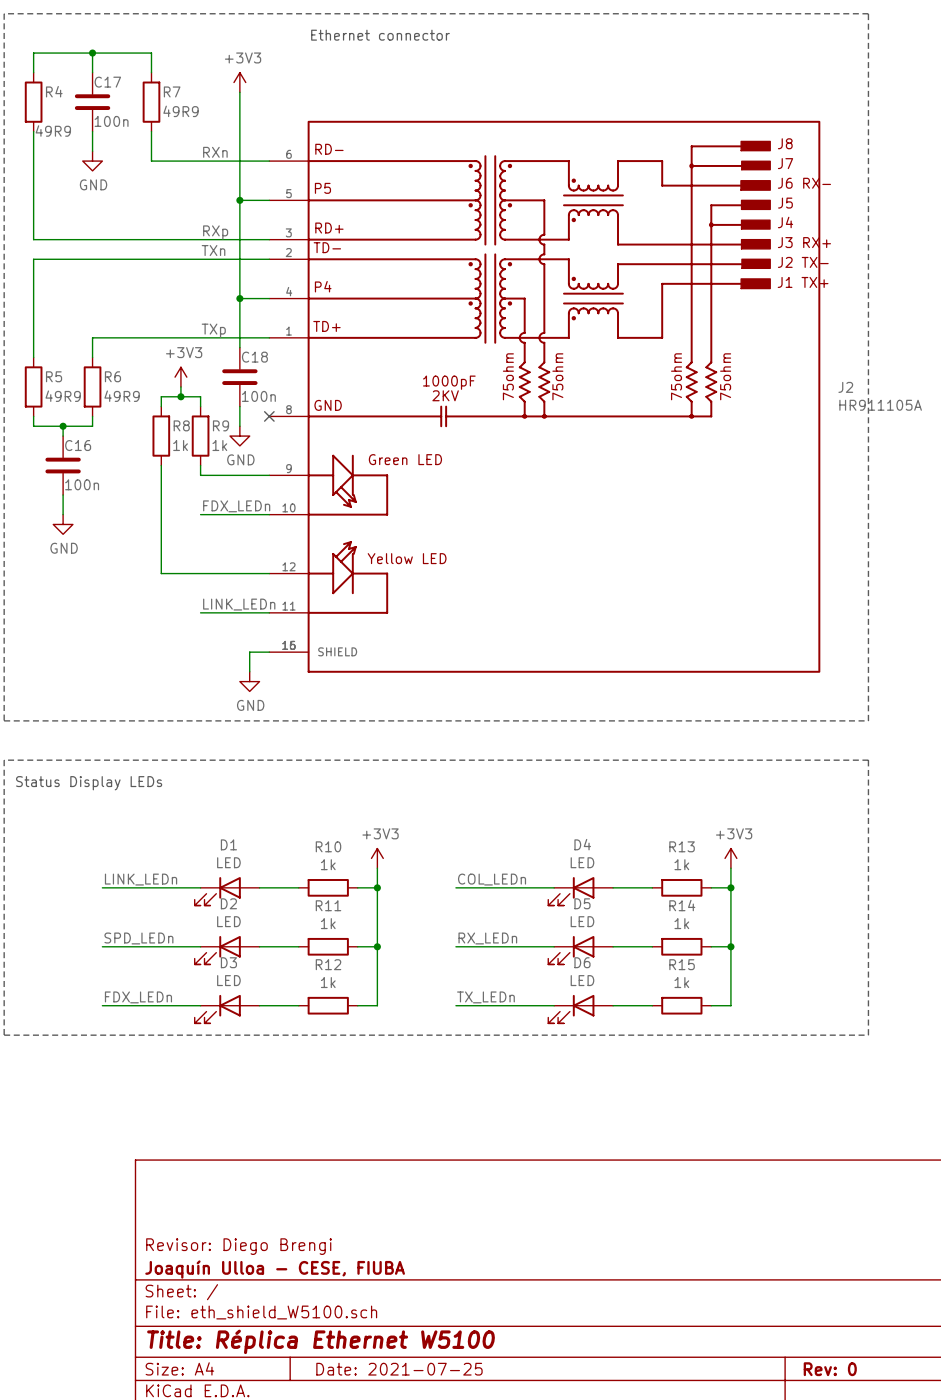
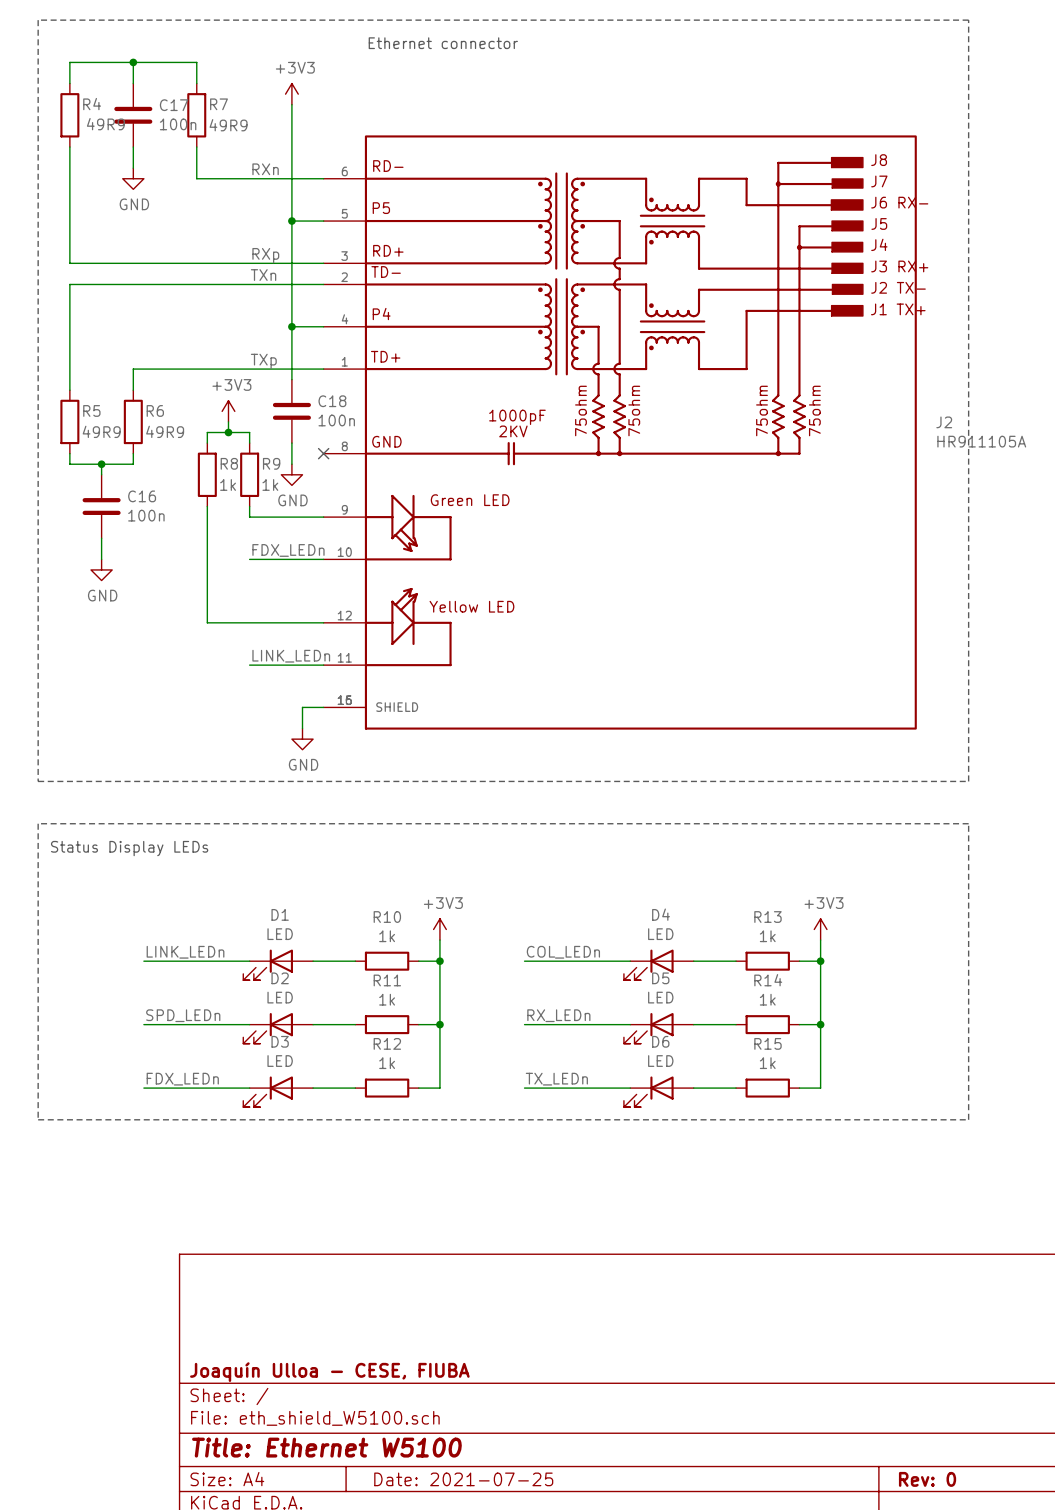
C17 name position: C17 (107, 82) -> C17 (174, 105)
C17 value position: 100n (111, 121) -> 100n (178, 124)
R4 value position: 49R9 (53, 131) -> 49R9 (105, 124)
C18 name position: C18 (254, 357) -> C18 (332, 401)
C18 value position: 100n (258, 396) -> 100n (336, 420)
C16 name position: C16 (78, 445) -> C16 (142, 496)
C16 value position: 100n (82, 484) -> 100n (146, 515)
title block: Revisor: Diego Brengi (239, 1246) -> none
title block: Title: Réplica Ethernet W5100 (321, 1341) -> Title: Ethernet W5100 (326, 1447)

